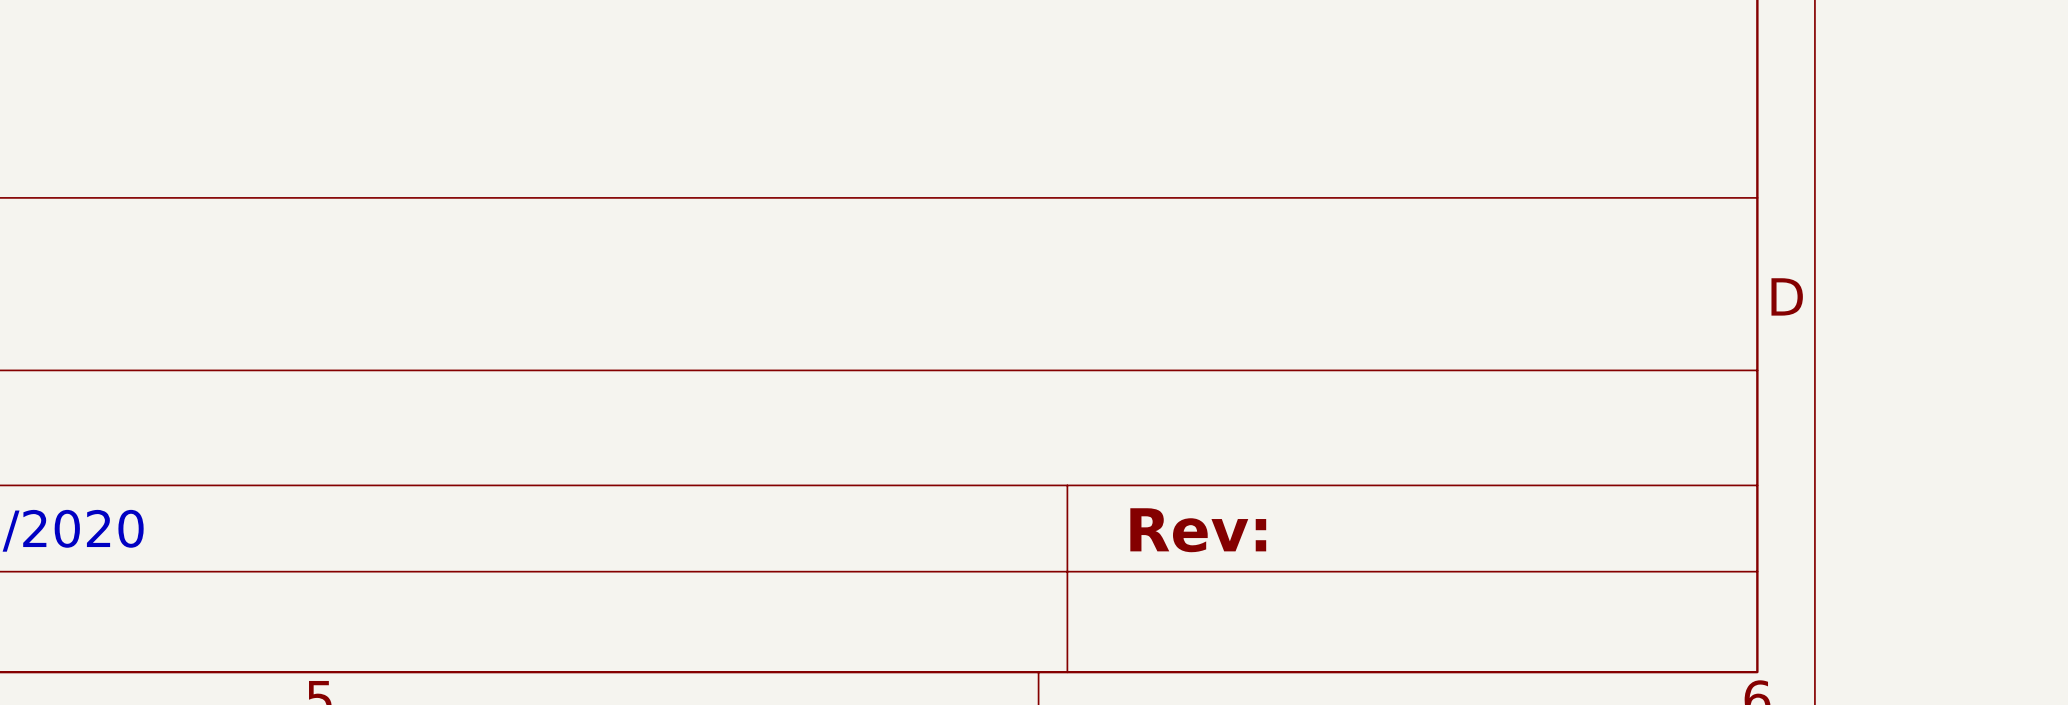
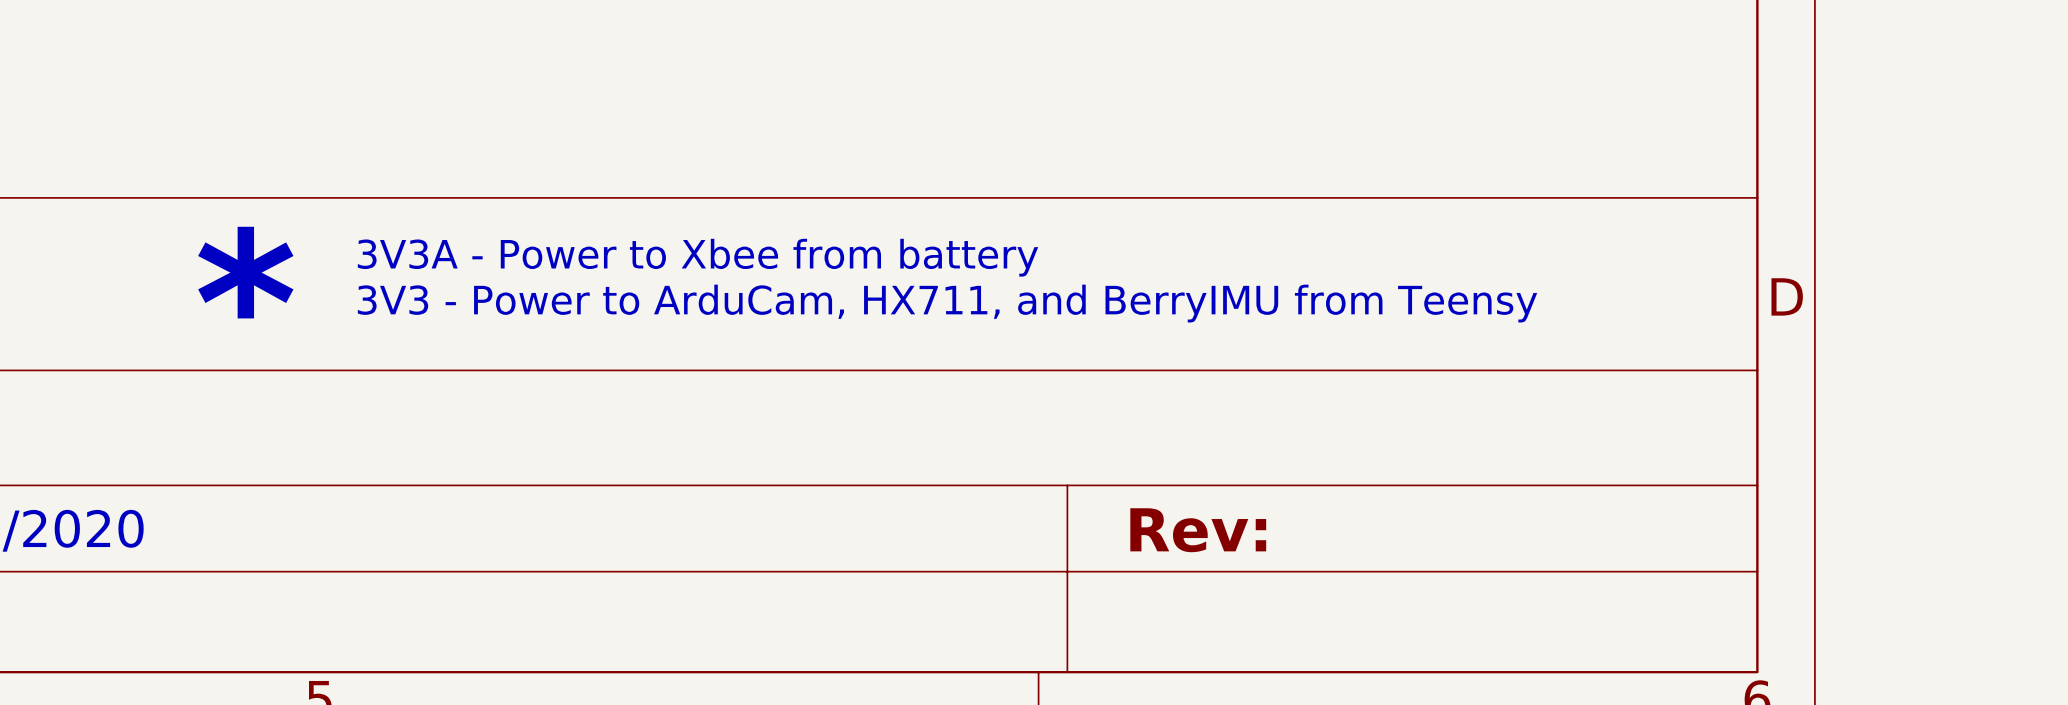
text: none -> 3V3A - Power to Xbee from battery (698, 257)
text: none -> * (245, 272)
text: none -> 3V3 - Power to ArduCam, HX711, and BerryIMU from Teensy (947, 303)

